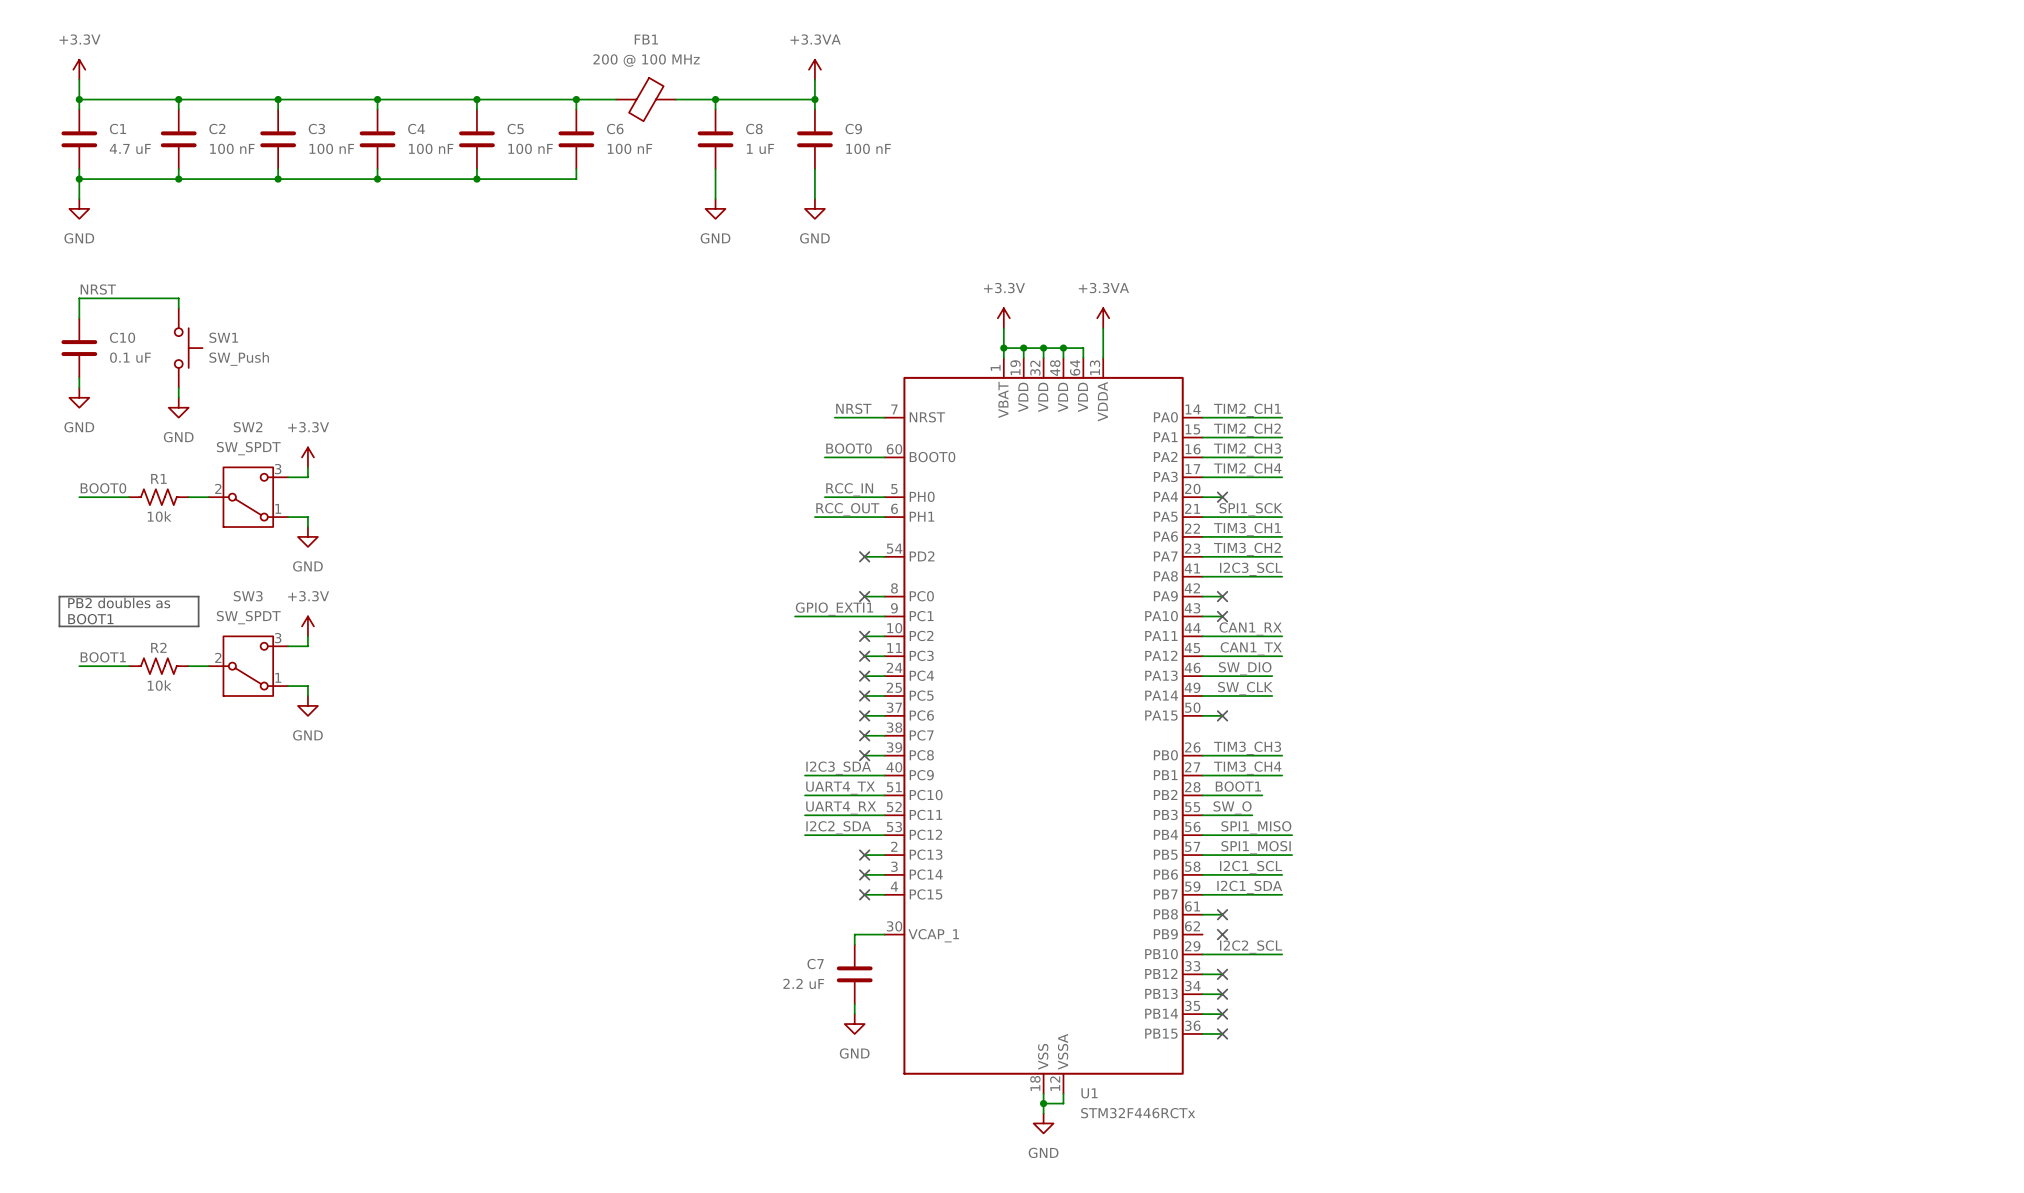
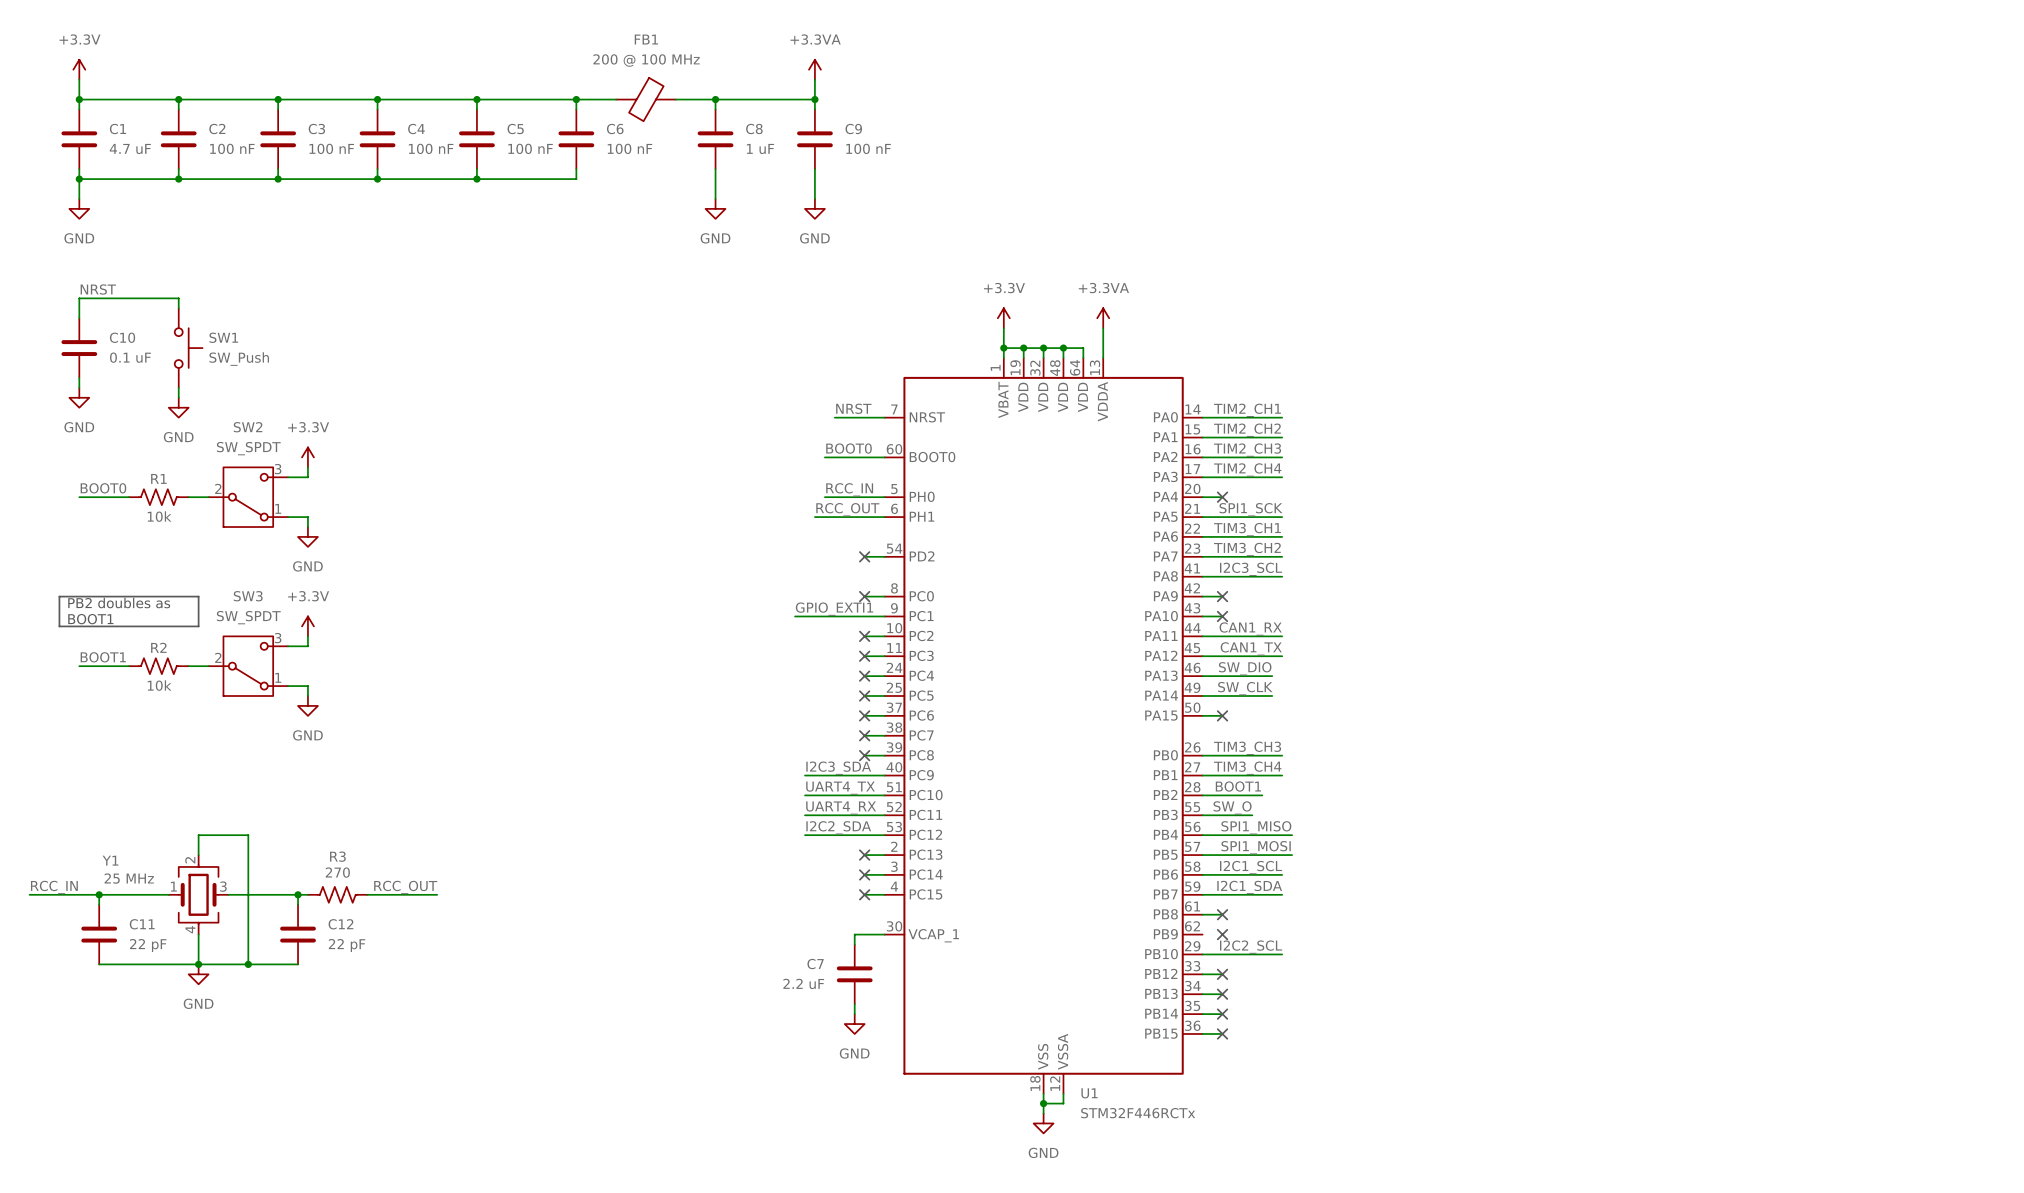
wire: none -> (198, 855) (198, 835) (248, 835) (248, 964)
label: none -> RCC_IN (54, 887)
label: none -> RCC_OUT (405, 887)
wire: none -> (29, 894) (168, 894)
wire: none -> (99, 894) (99, 904)
junction: none -> (99, 894)
Y1: none -> 25 MHz (198, 894)
wire: none -> (228, 894) (307, 894)
wire: none -> (298, 894) (298, 904)
junction: none -> (298, 894)
R3: none -> 270 (337, 894)
wire: none -> (367, 894) (437, 894)
C11: none -> 22 pF (99, 934)
wire: none -> (198, 934) (198, 964)
C12: none -> 22 pF (298, 934)
wire: none -> (99, 964) (298, 964)
junction: none -> (198, 964)
junction: none -> (248, 964)
power symbol: none -> GND (198, 974)

